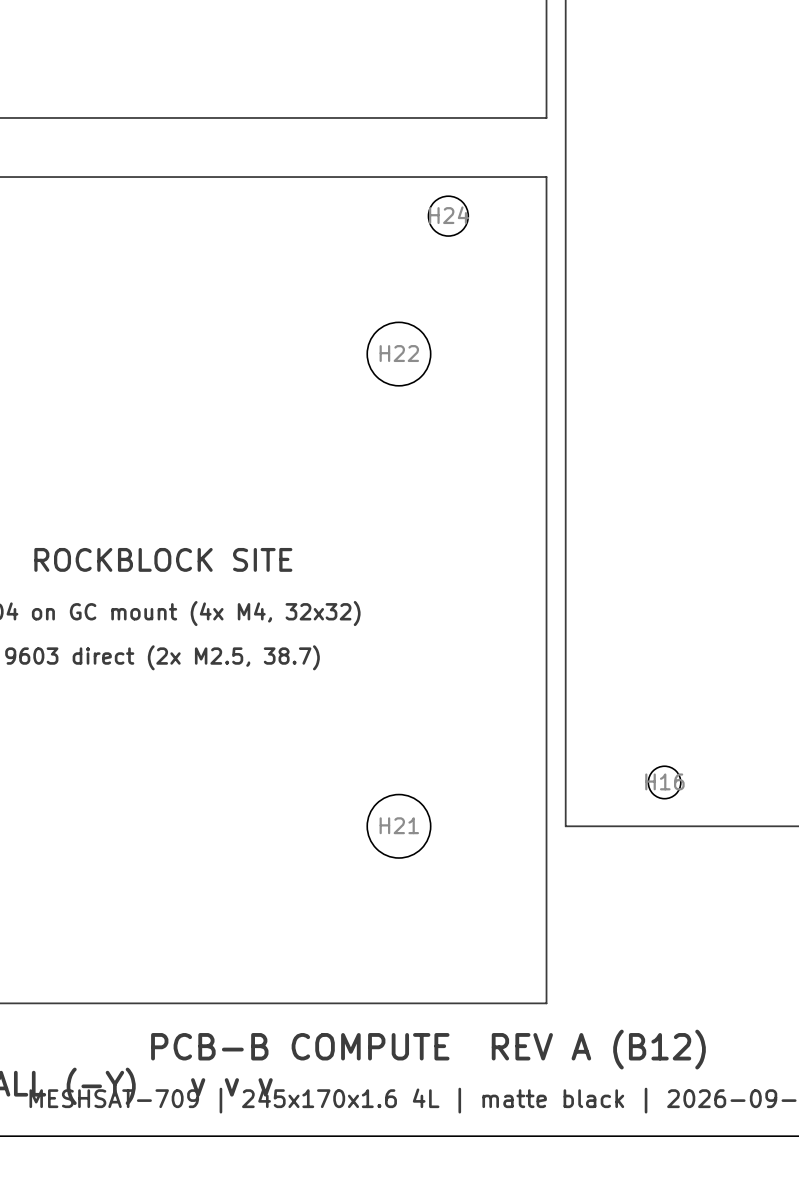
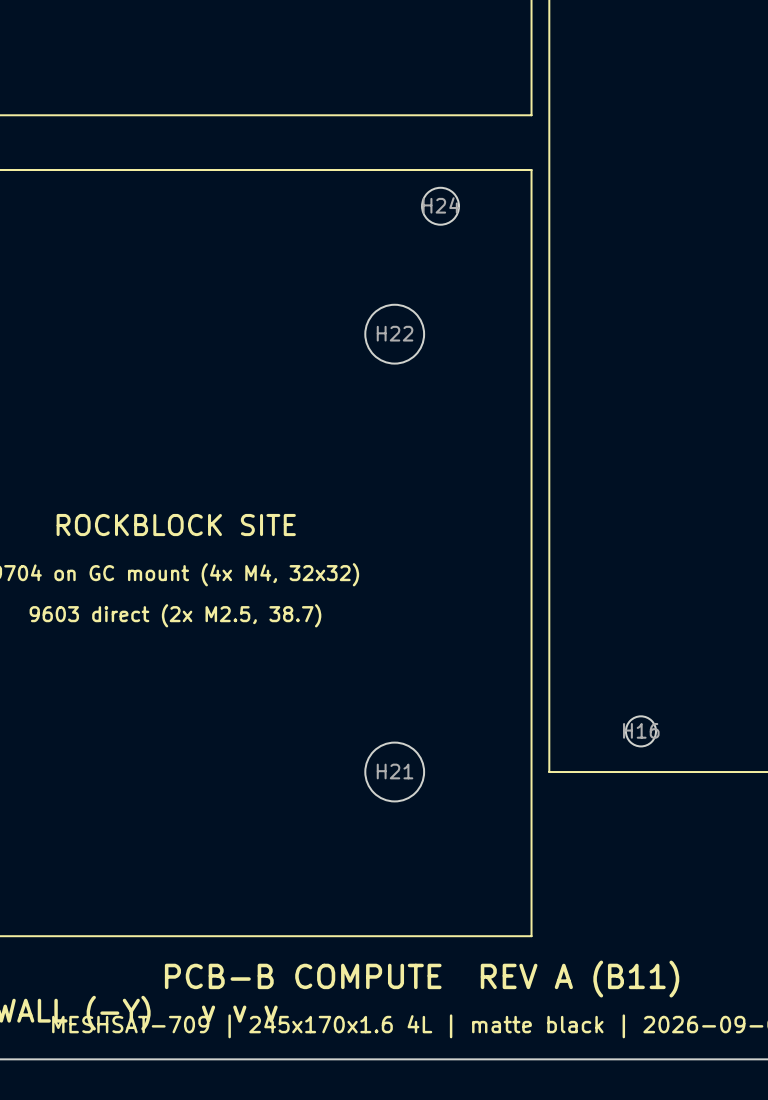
text: PCB-B COMPUTE REV A (B12) (428, 1049) -> PCB-B COMPUTE REV A (B11) (422, 979)

